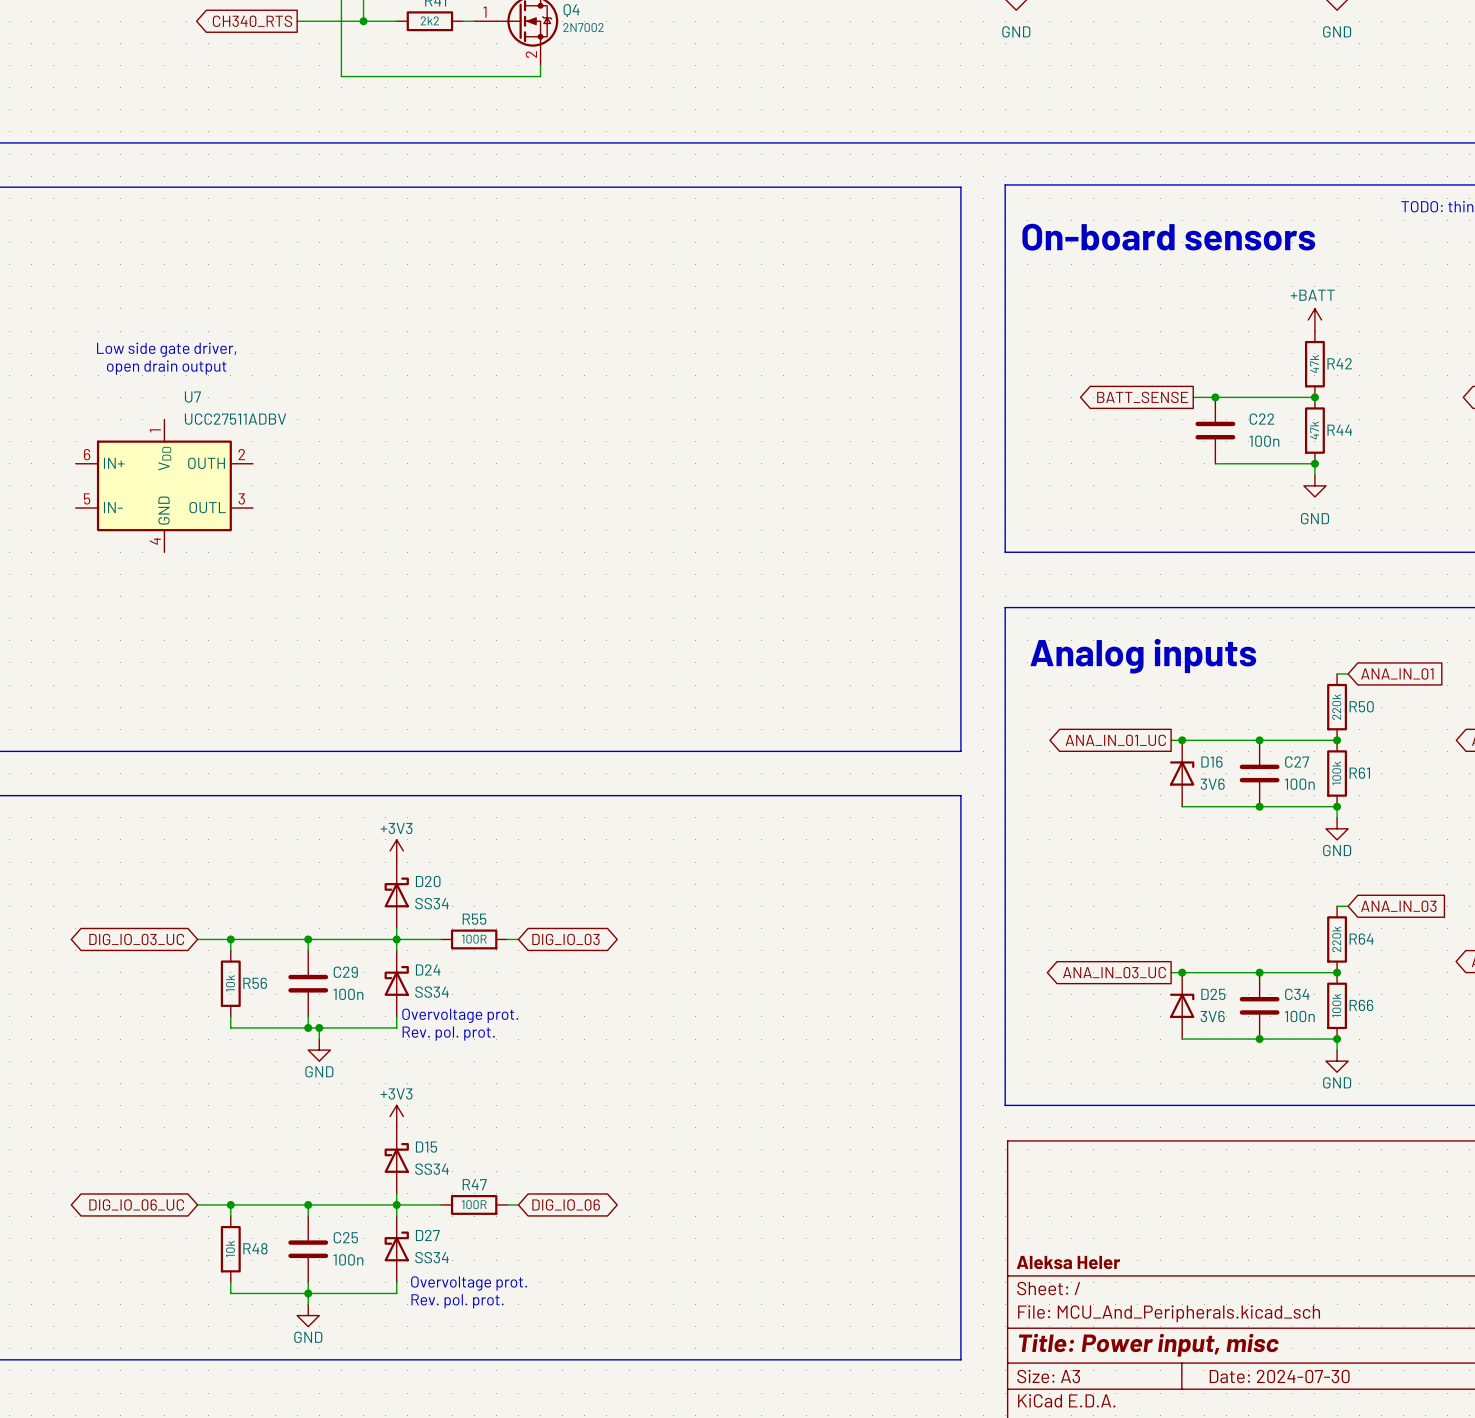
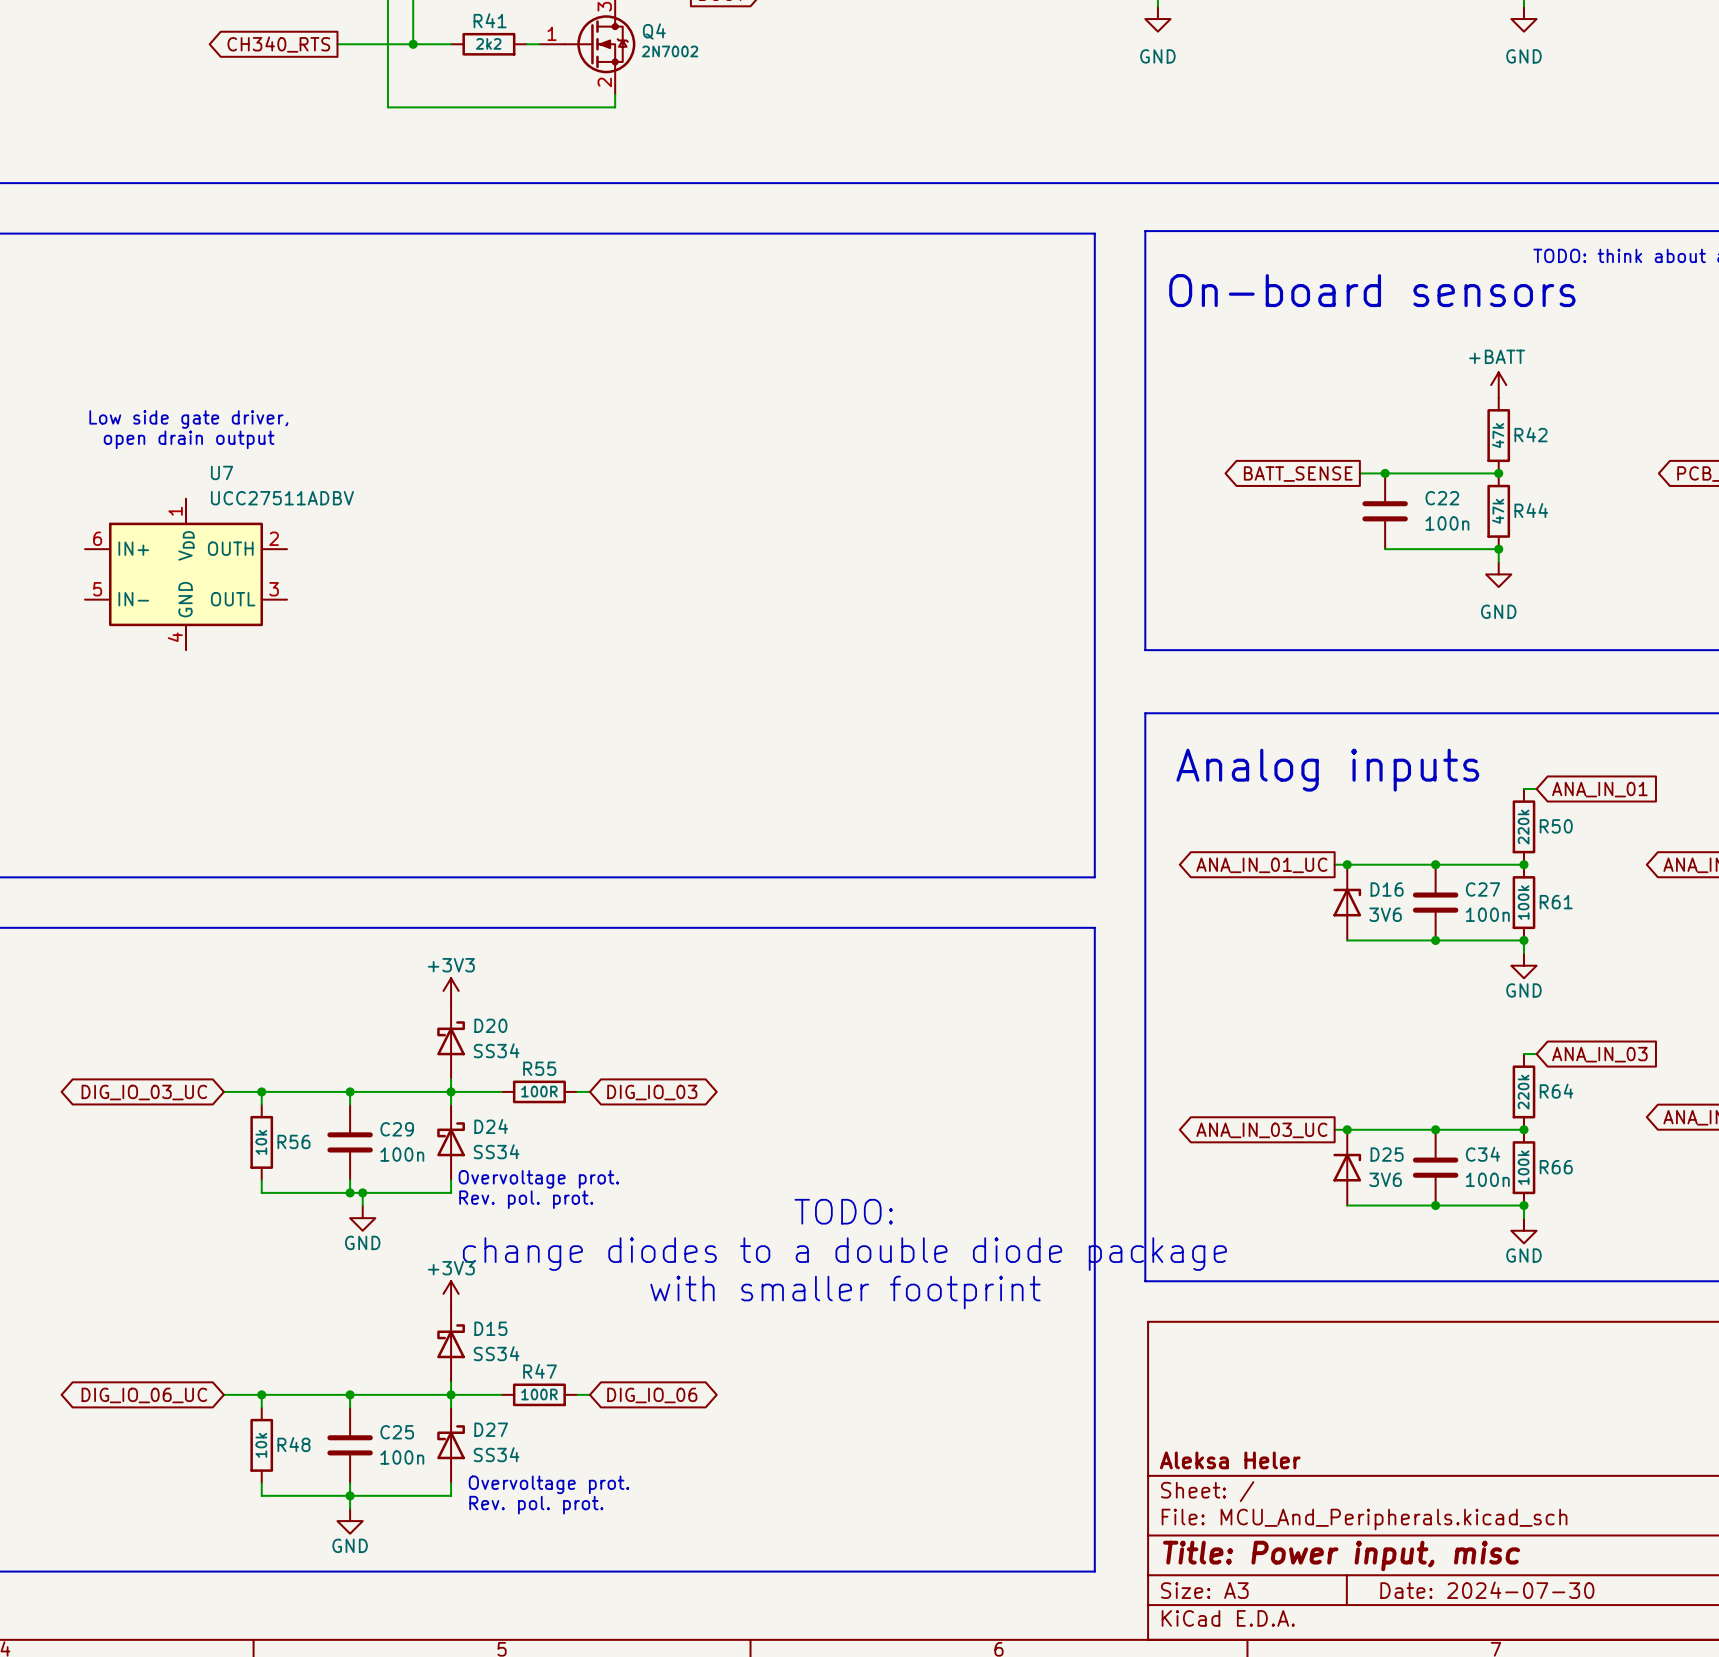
text: none -> TODO: (843, 1211)
text: none -> change diodes to a double diode package (844, 1254)
text: none -> with smaller footprint (845, 1292)

